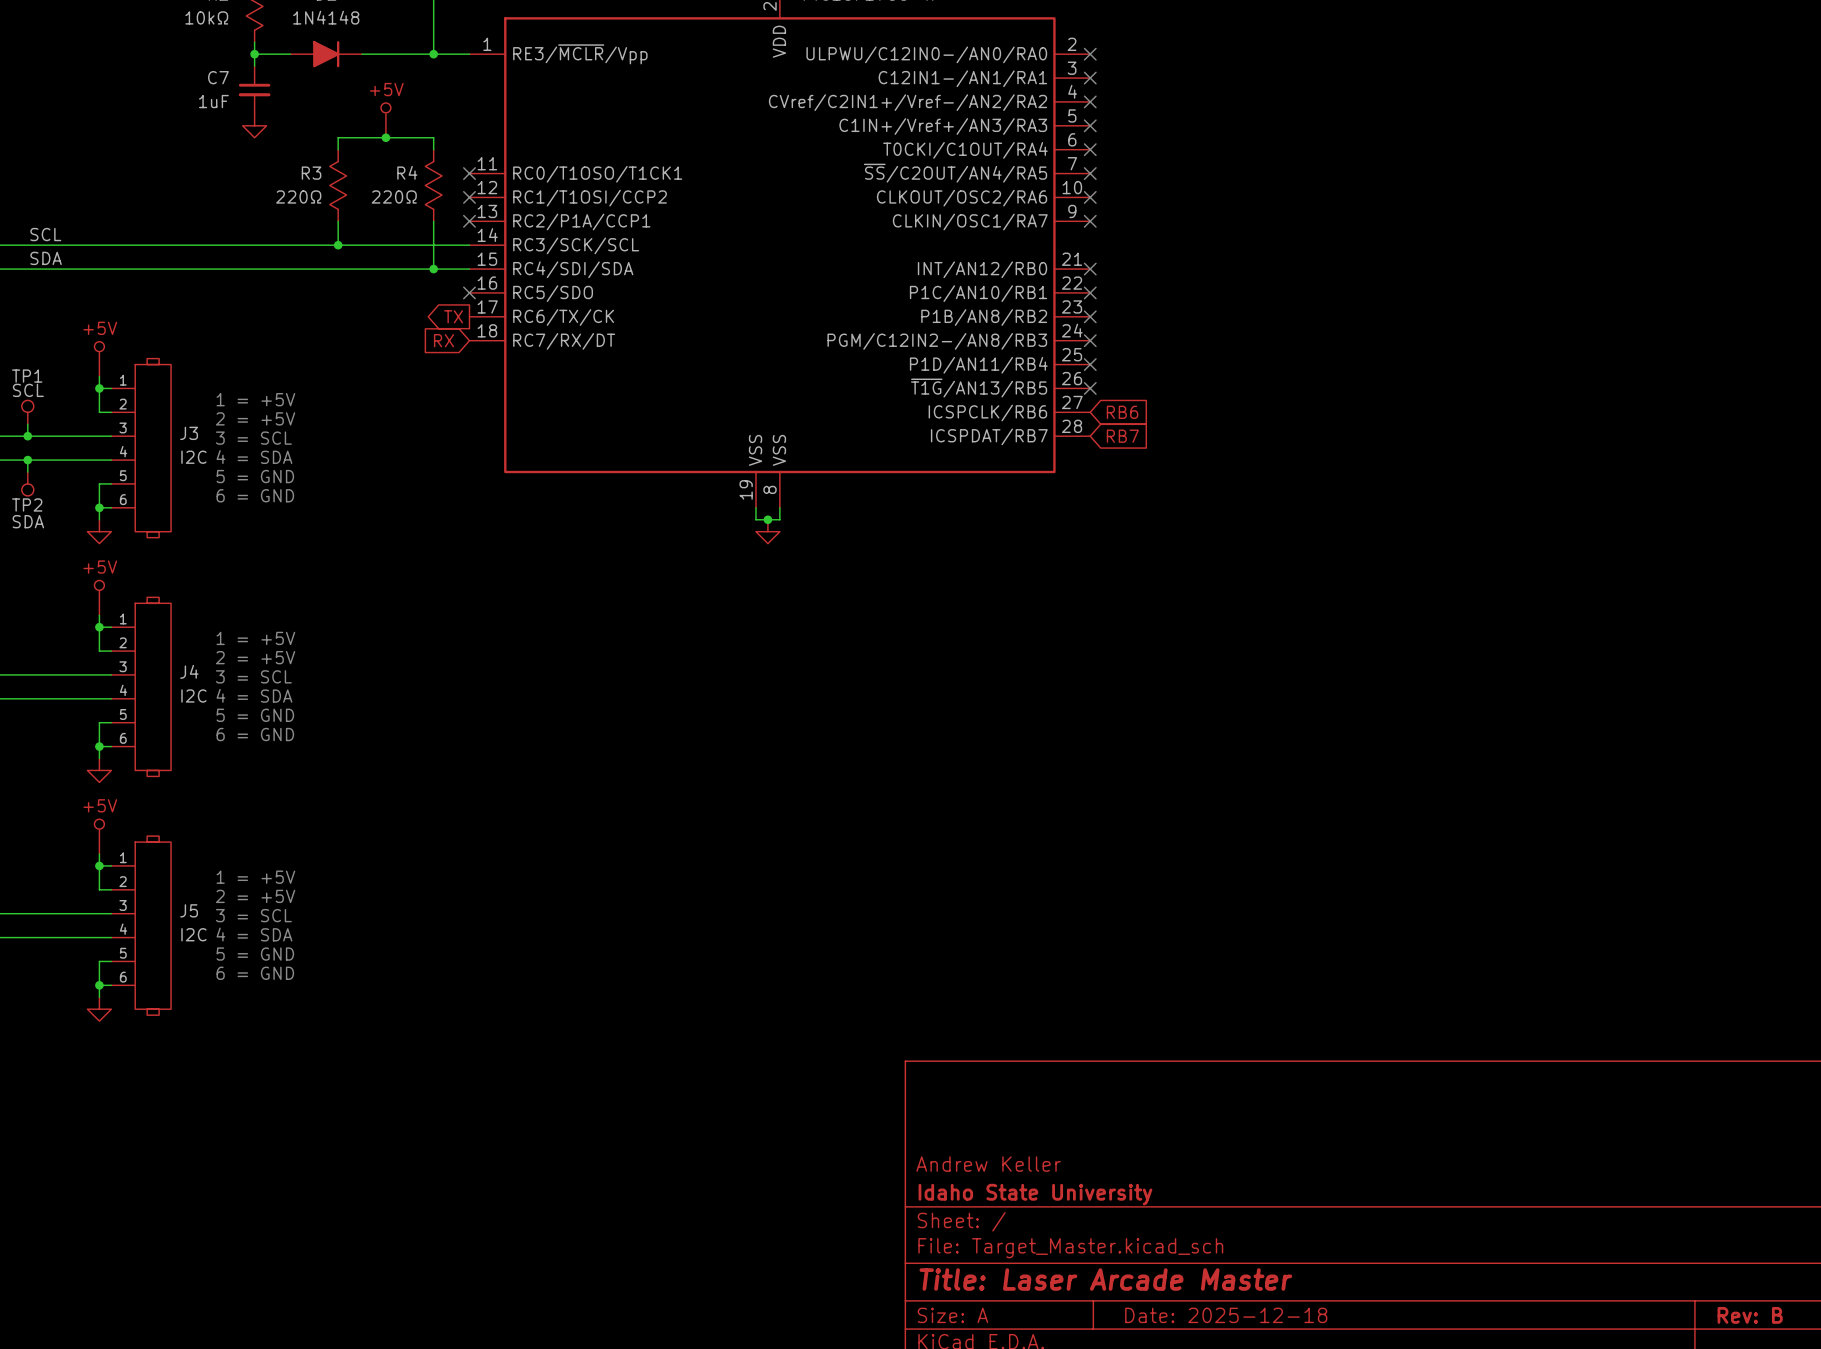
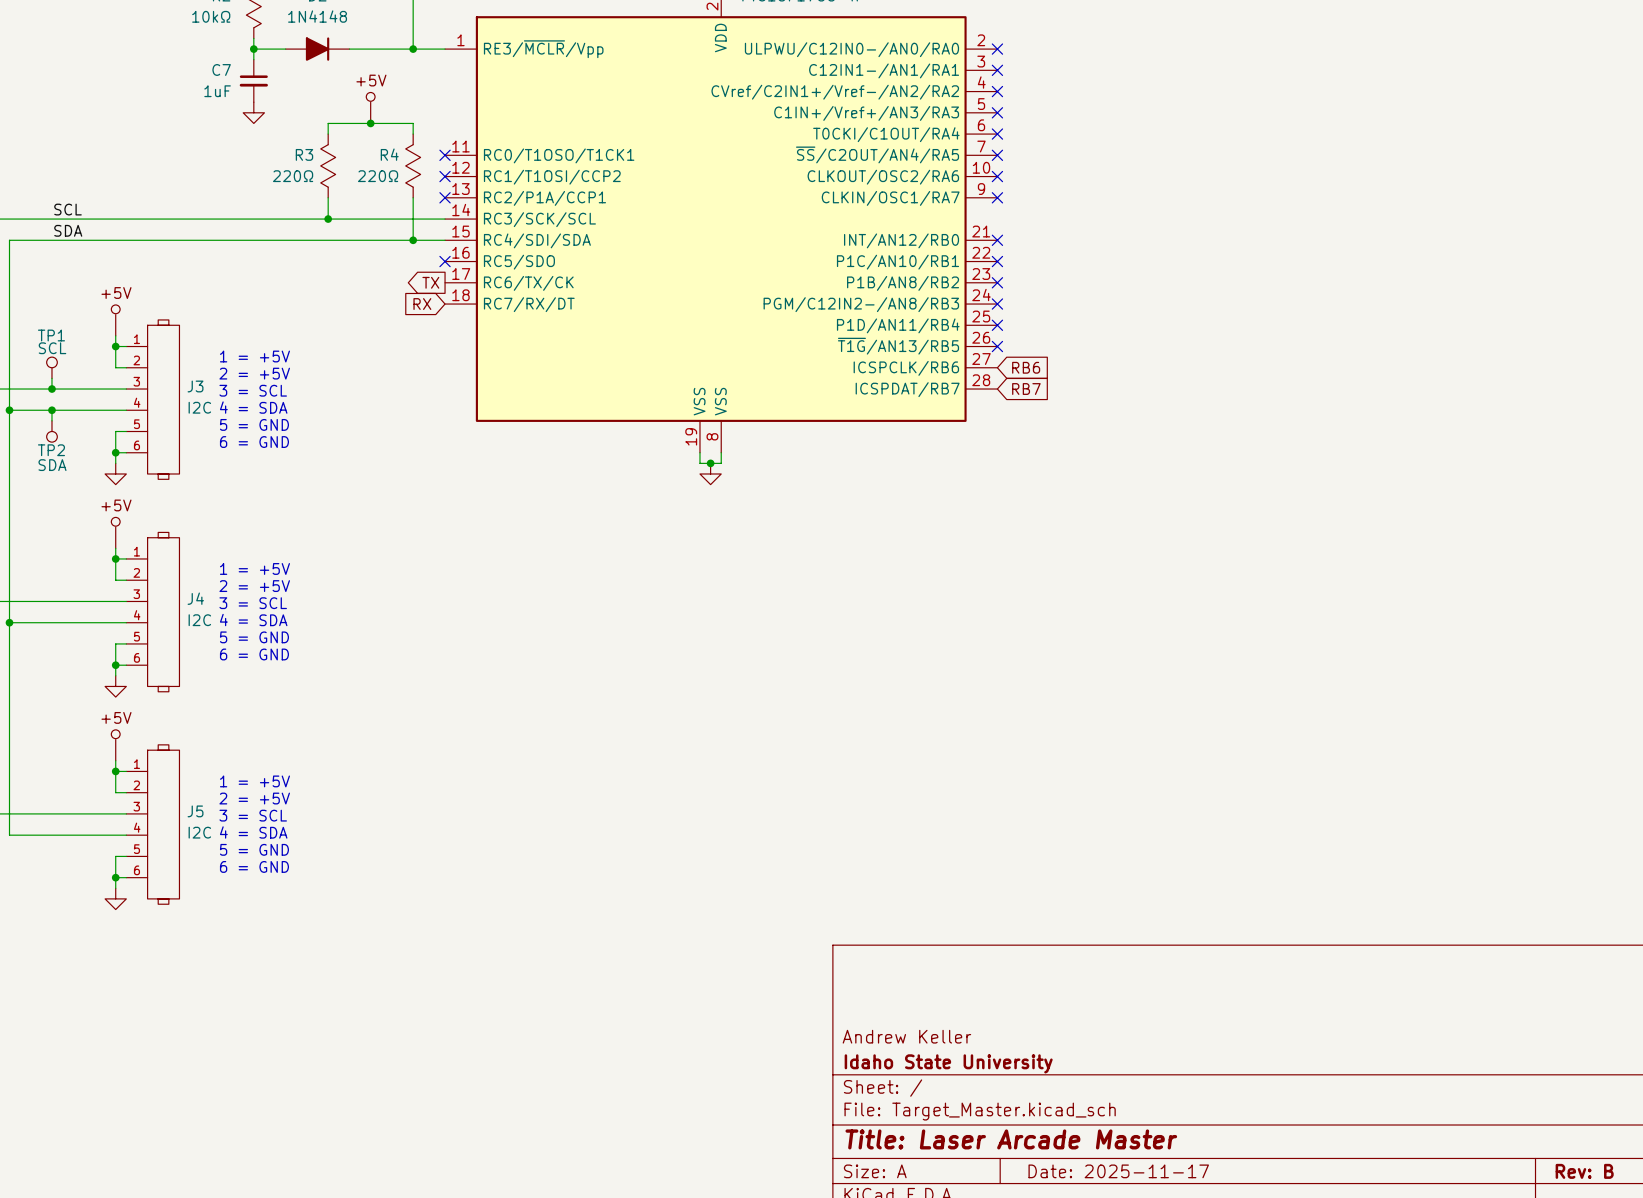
title block: Date: 2025-12-18 (1226, 1315) -> Date: 2025-11-17 (1118, 1171)

